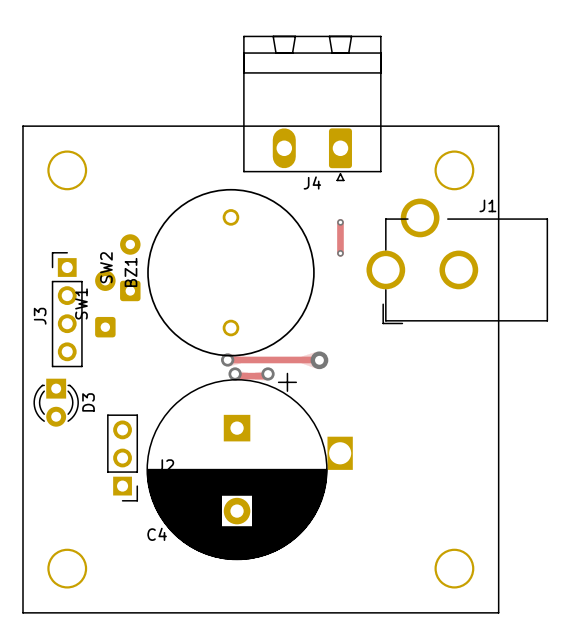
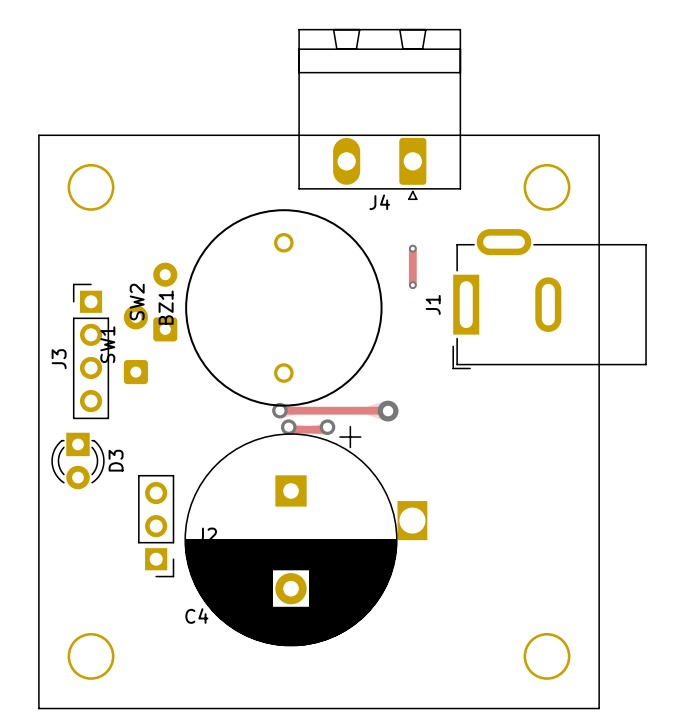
J1 footprint: [366, 198, 549, 325] -> [452, 229, 647, 370]
J1 name position: J1 (487, 205) -> J1 (433, 304)

